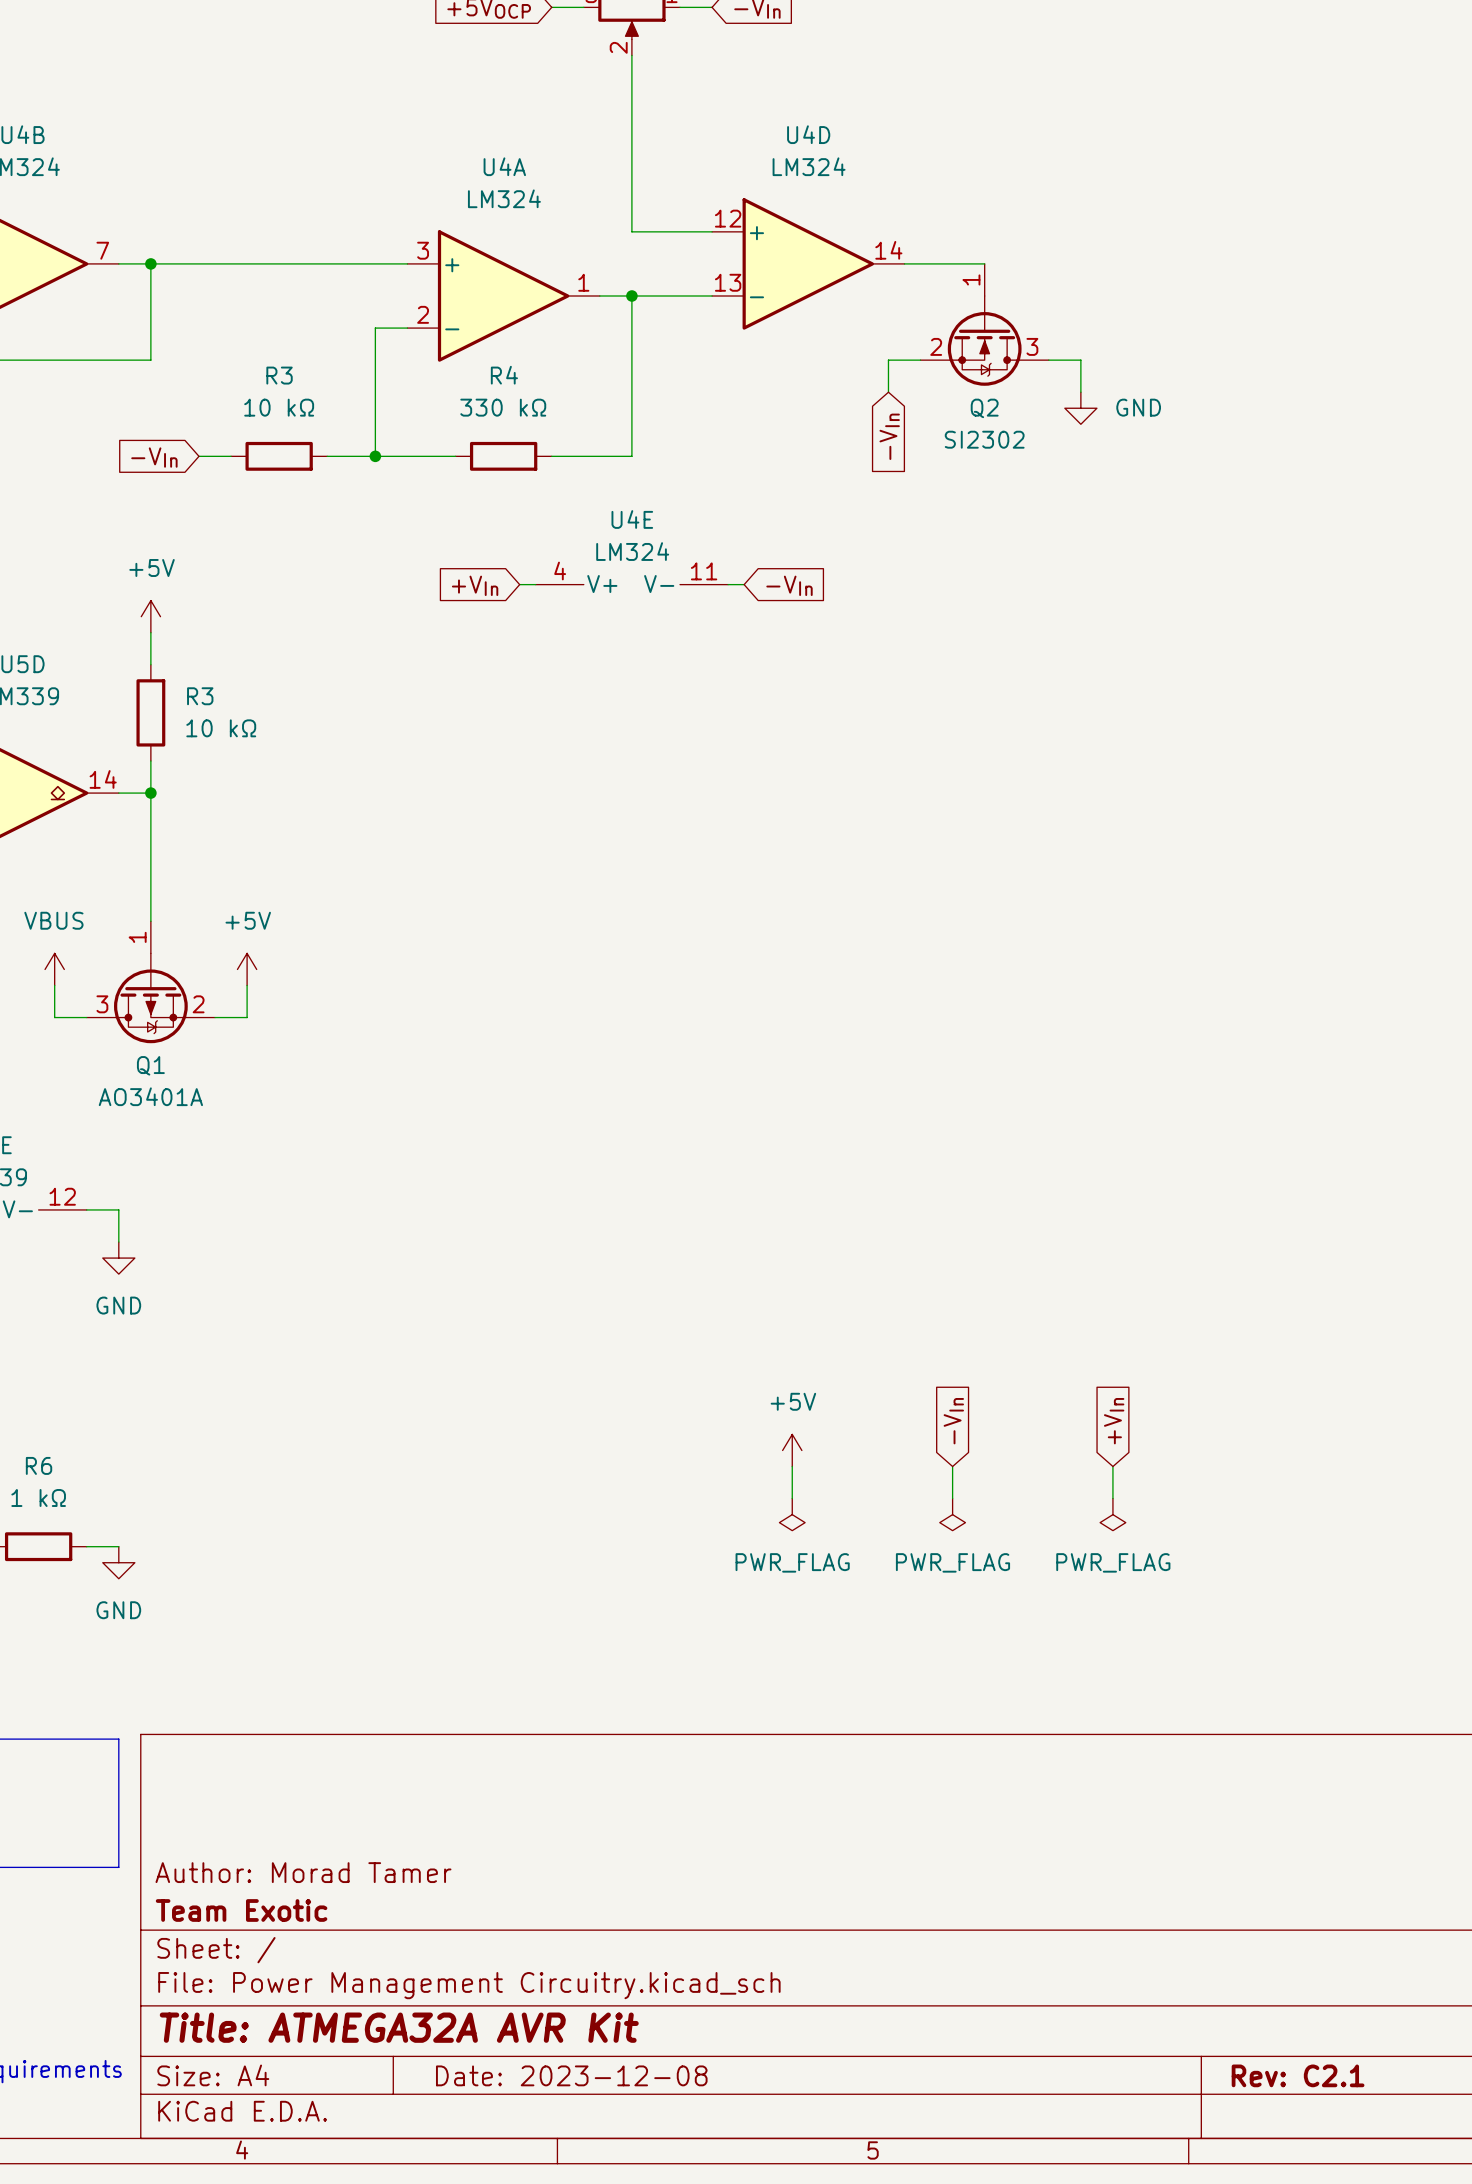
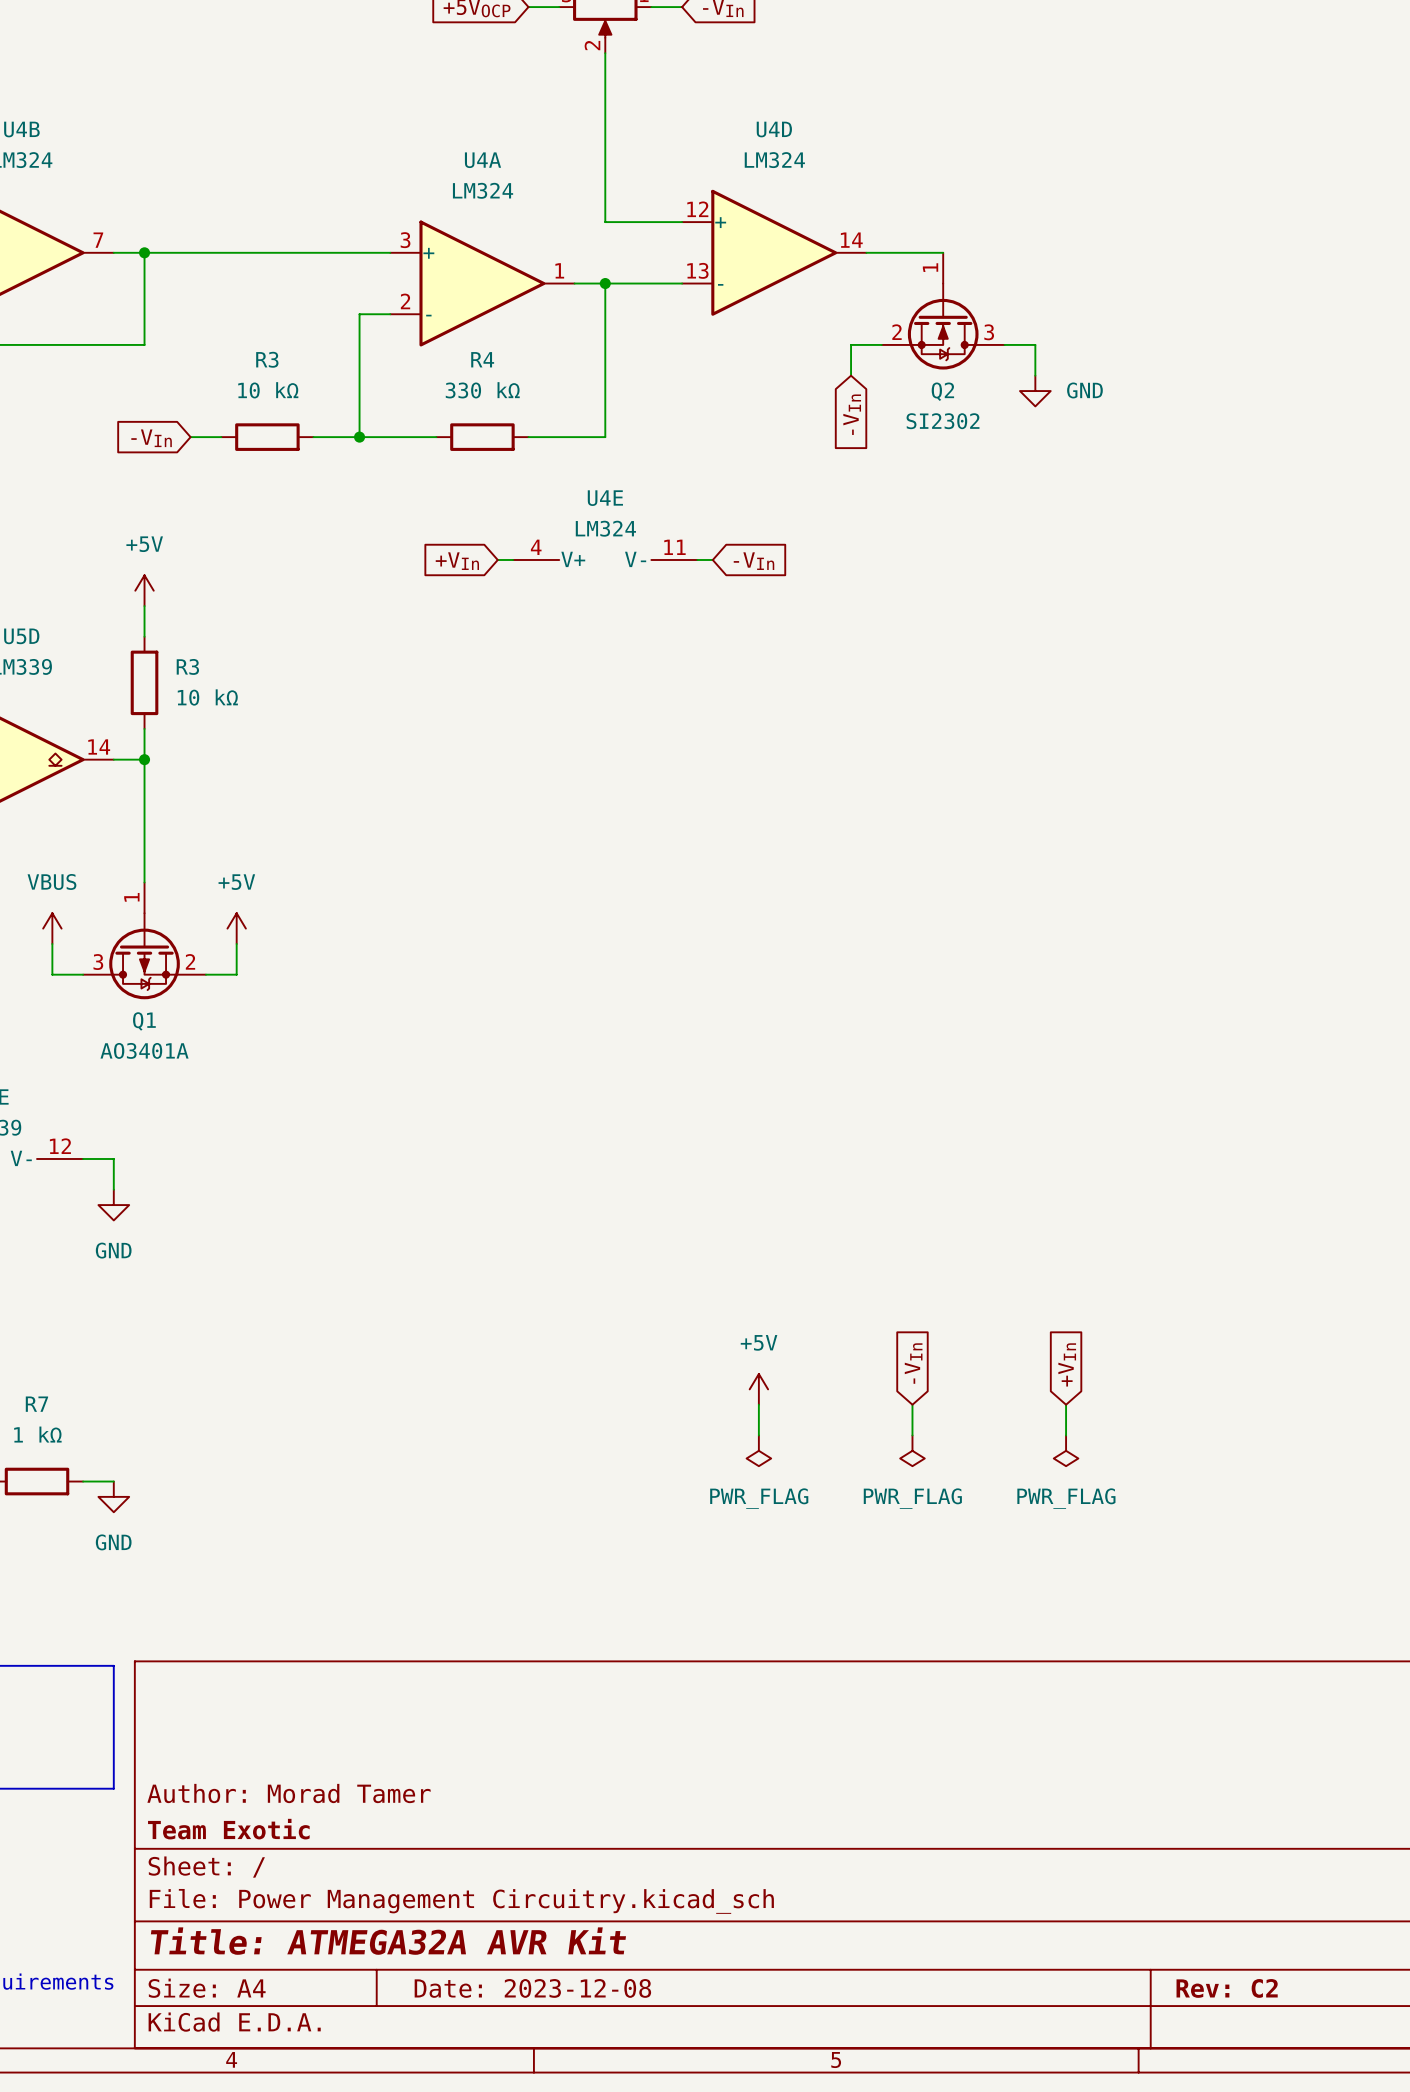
R6 name: R6 (39, 1465) -> R7 (36, 1404)
title block: Rev: C2.1 (1298, 2075) -> Rev: C2 (1227, 1988)

